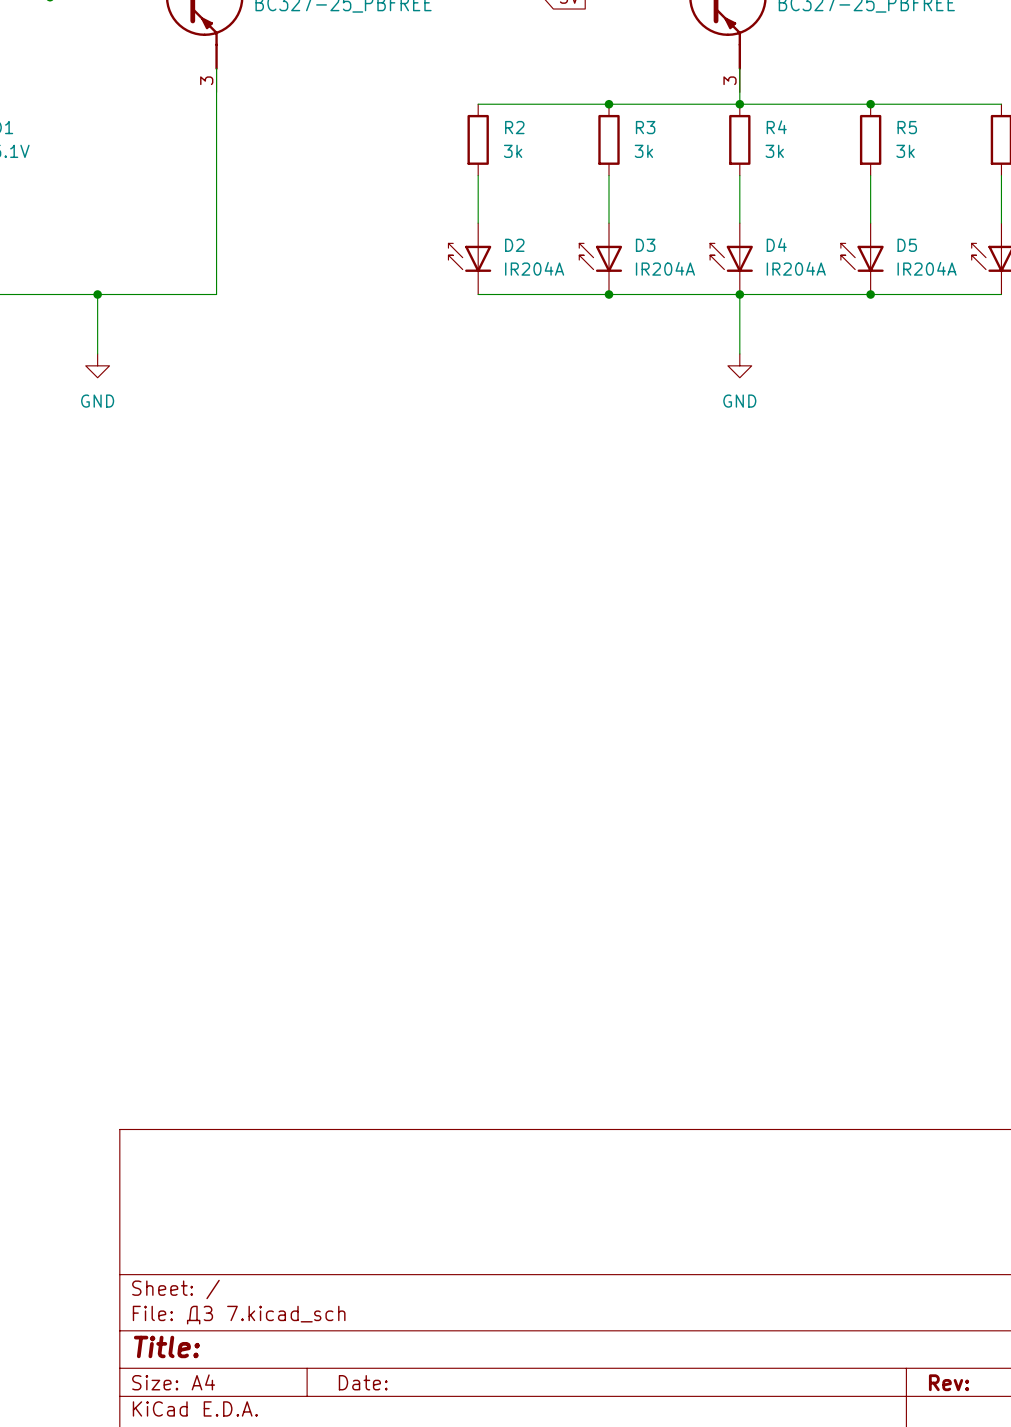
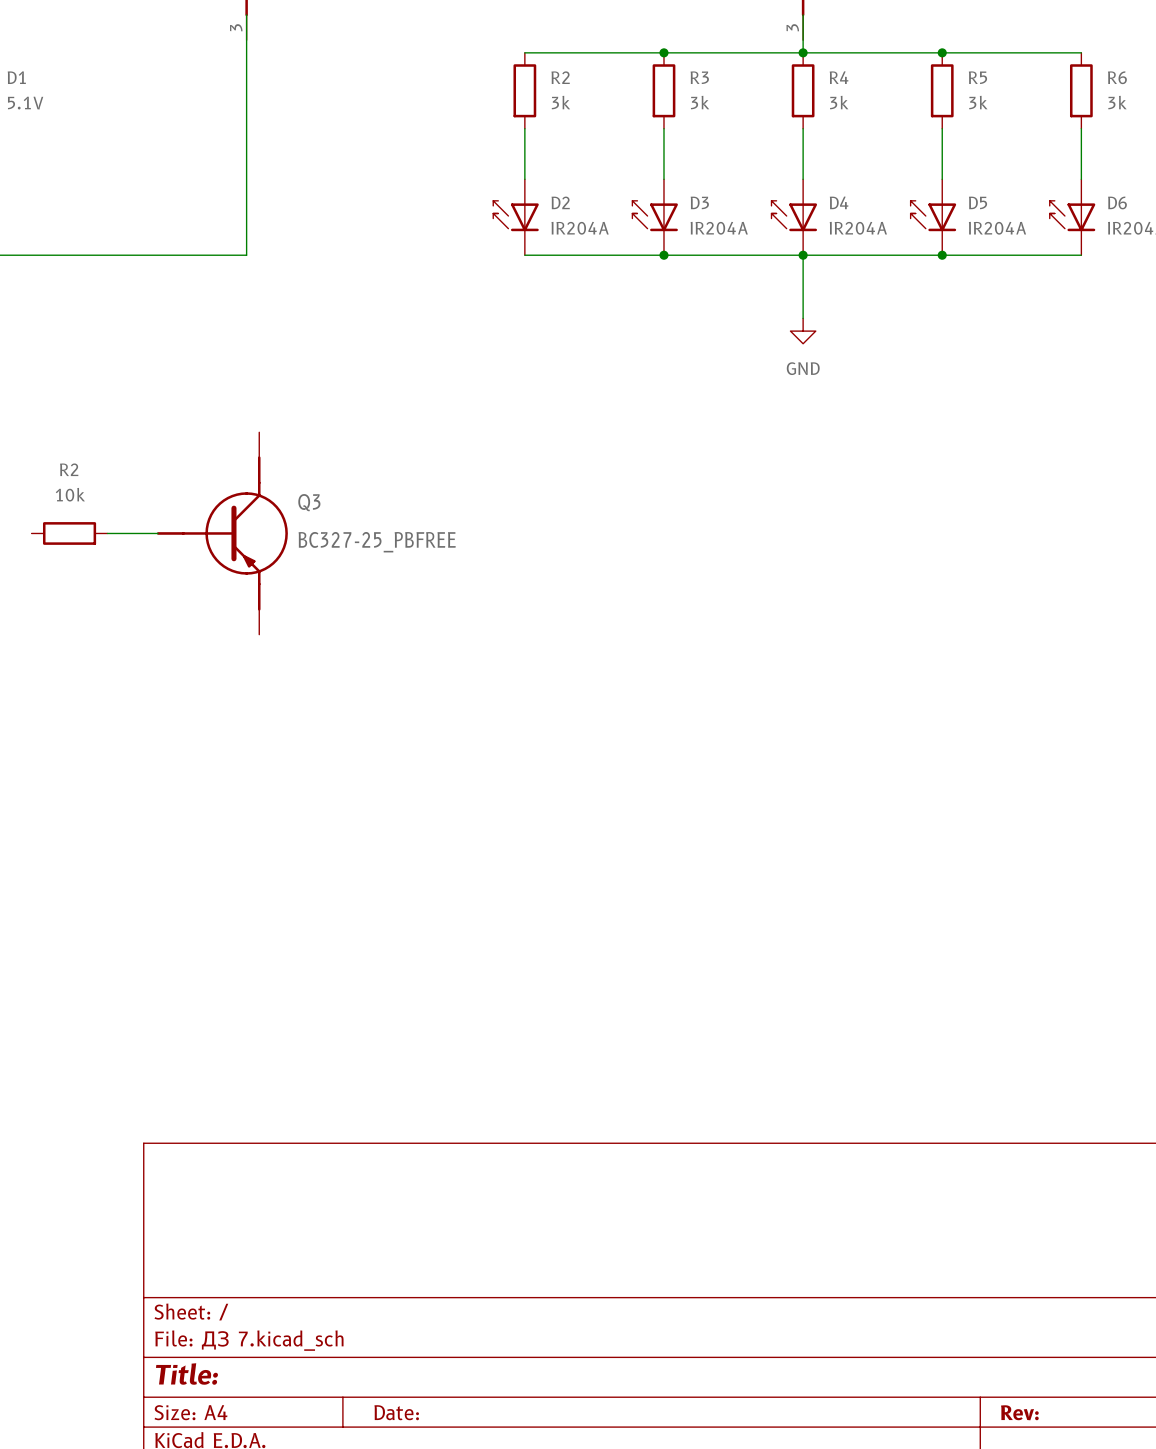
wire: (97, 294) (97, 353) -> none
junction: (97, 294) -> none
power symbol: GND (97, 365) -> none
R2: none -> 10k (69, 533)
wire: none -> (107, 533) (158, 533)
Q3: none -> (222, 533)

